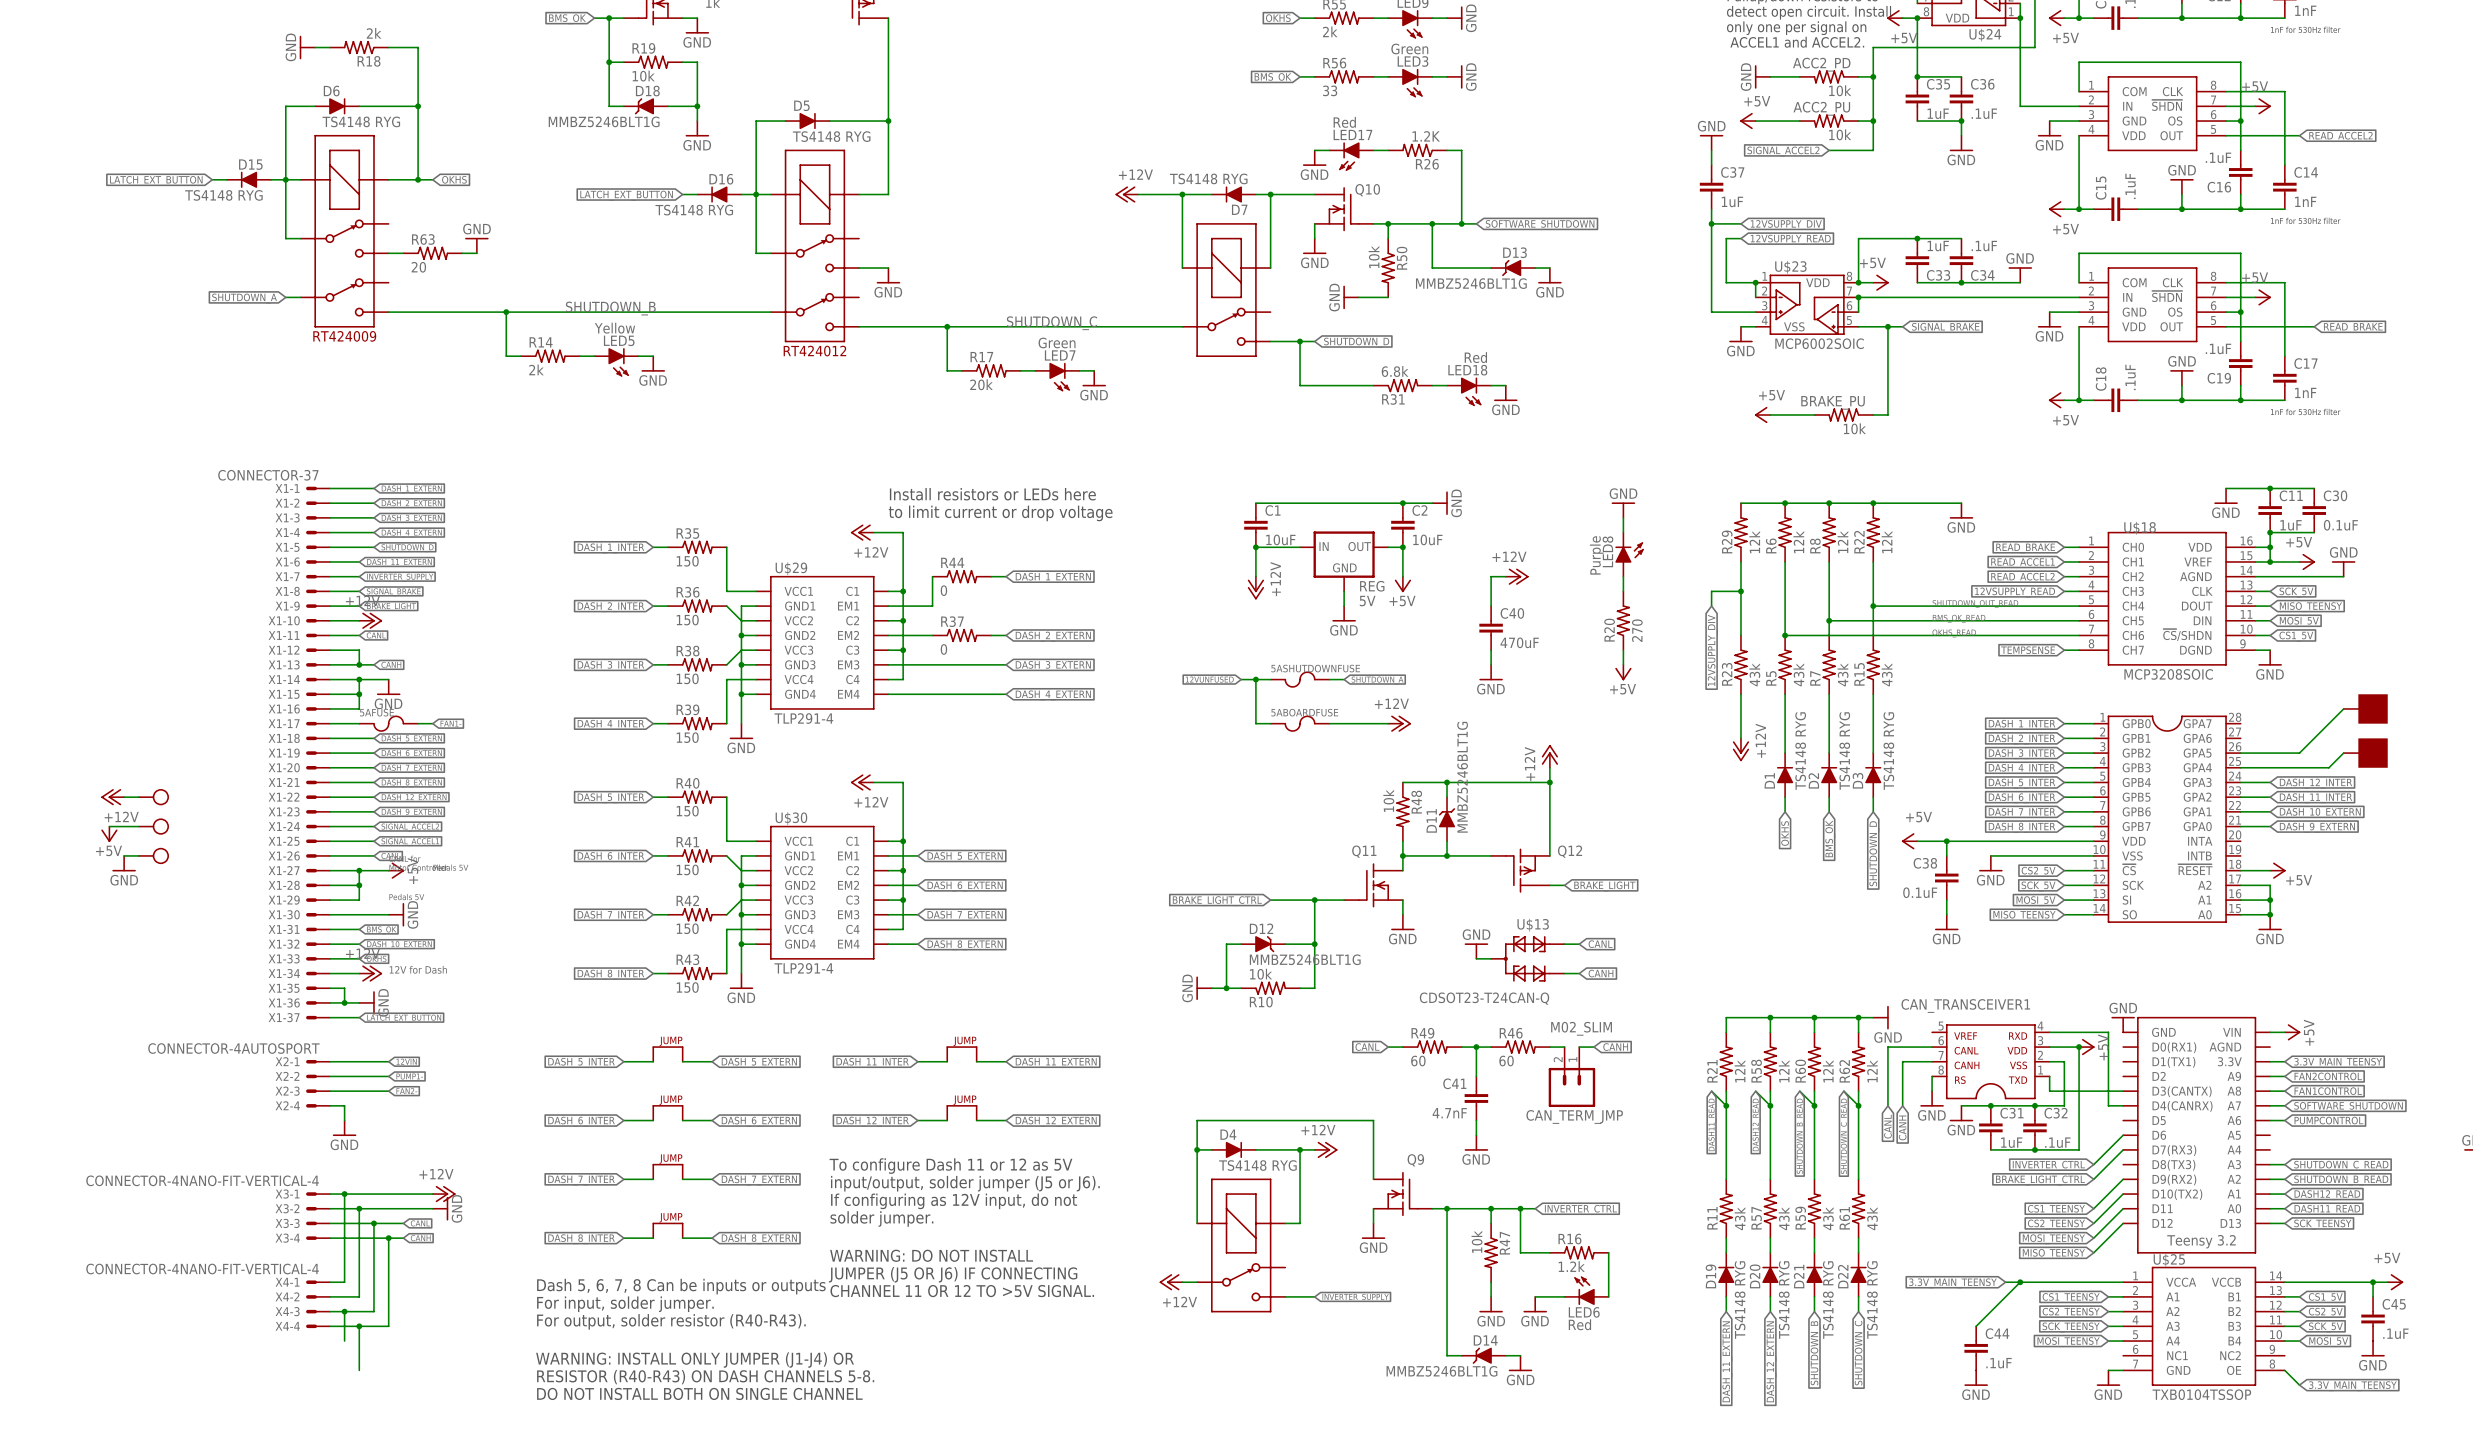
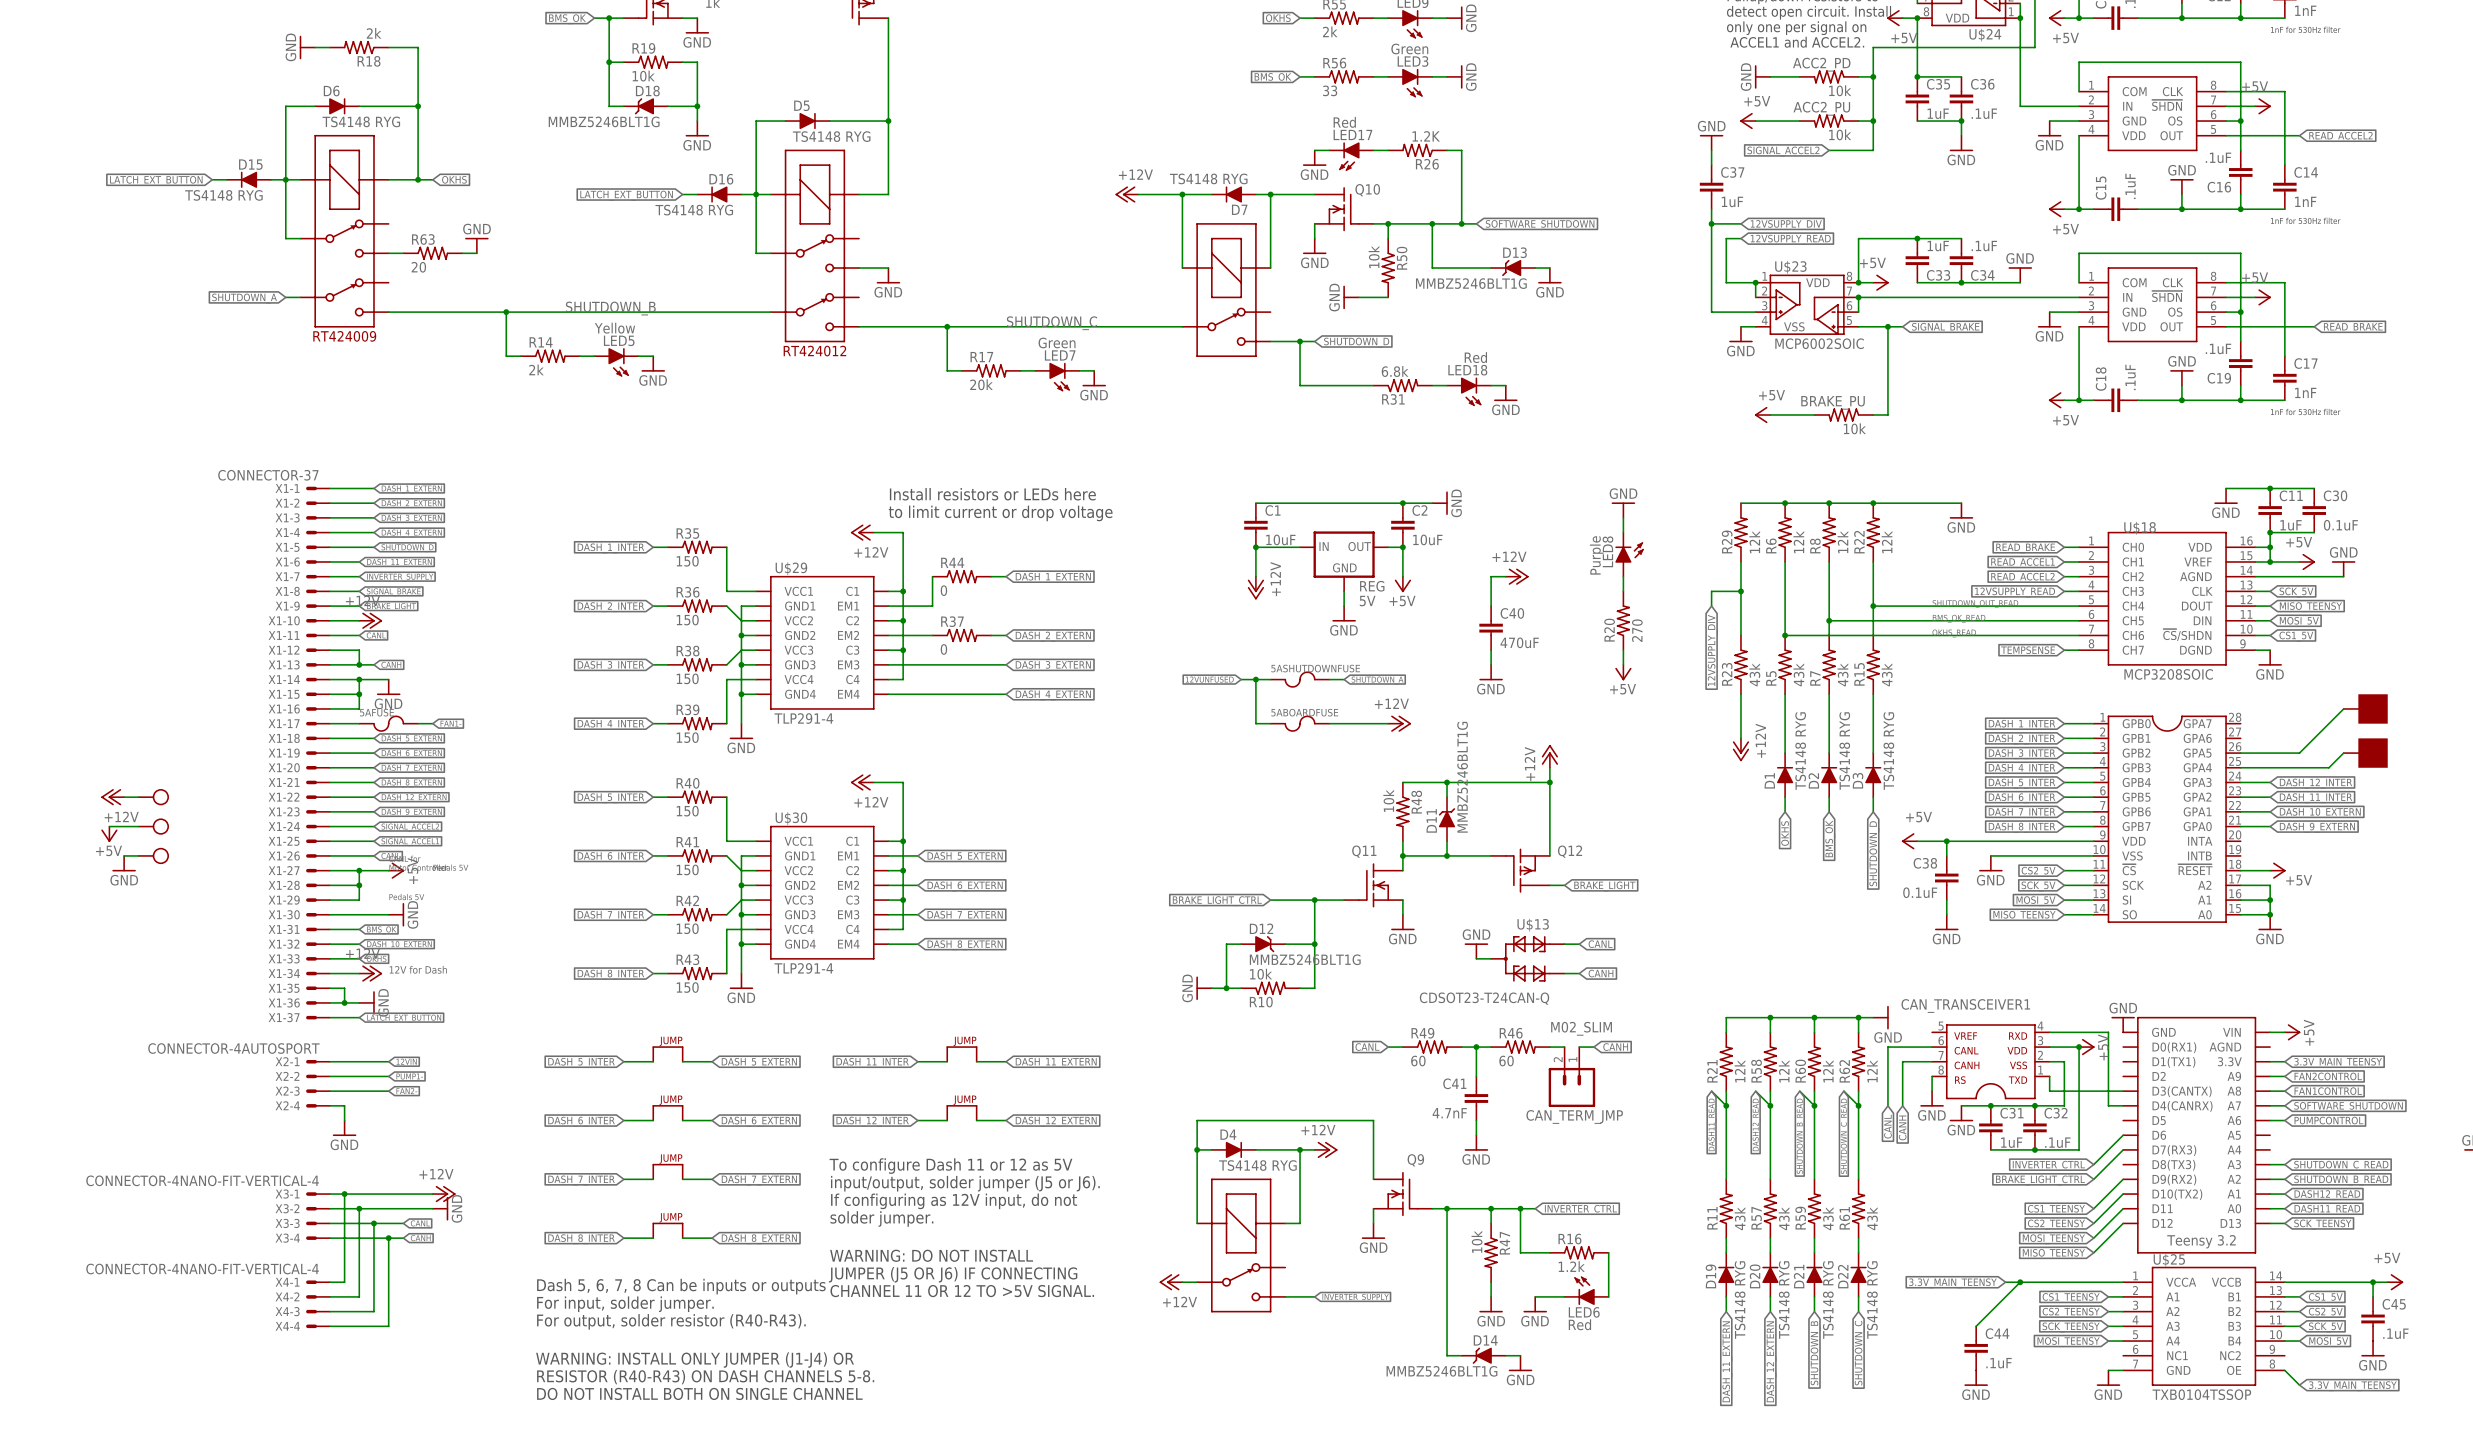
wire: (344, 1311) (344, 1341) -> none
junction: (344, 1311) -> none
wire: (359, 1326) (359, 1370) -> none
junction: (359, 1326) -> none

